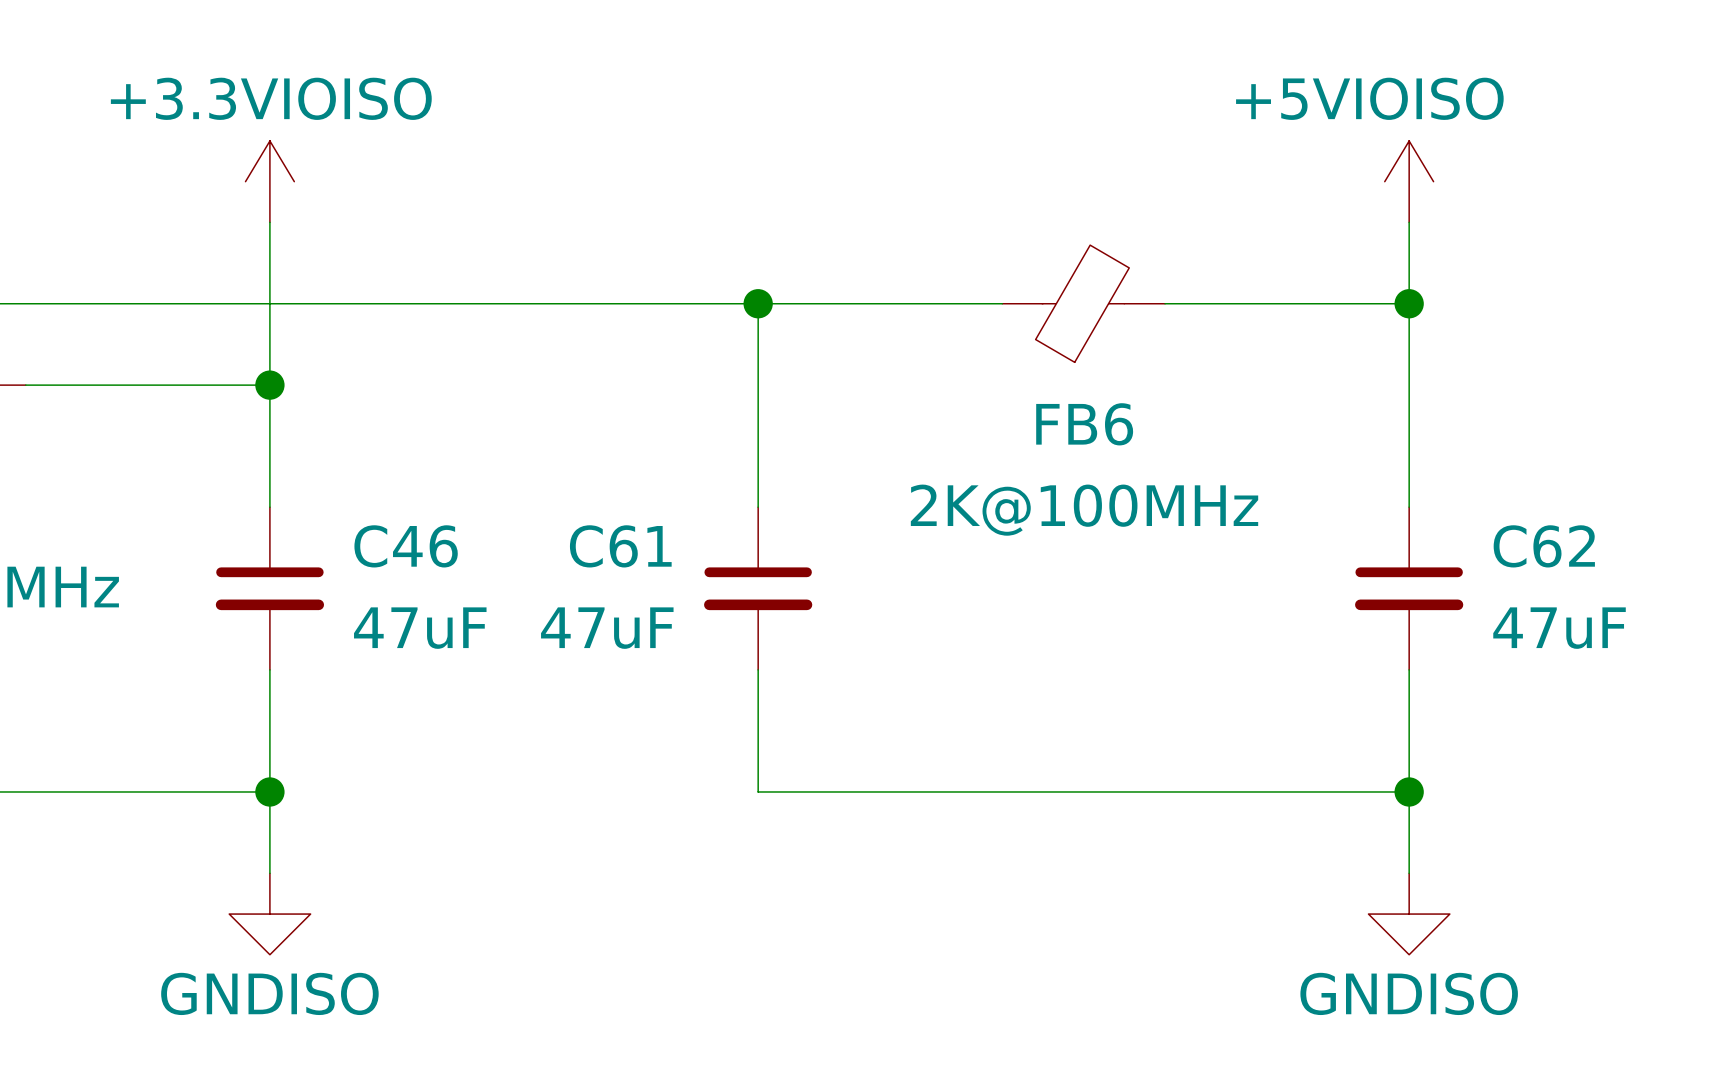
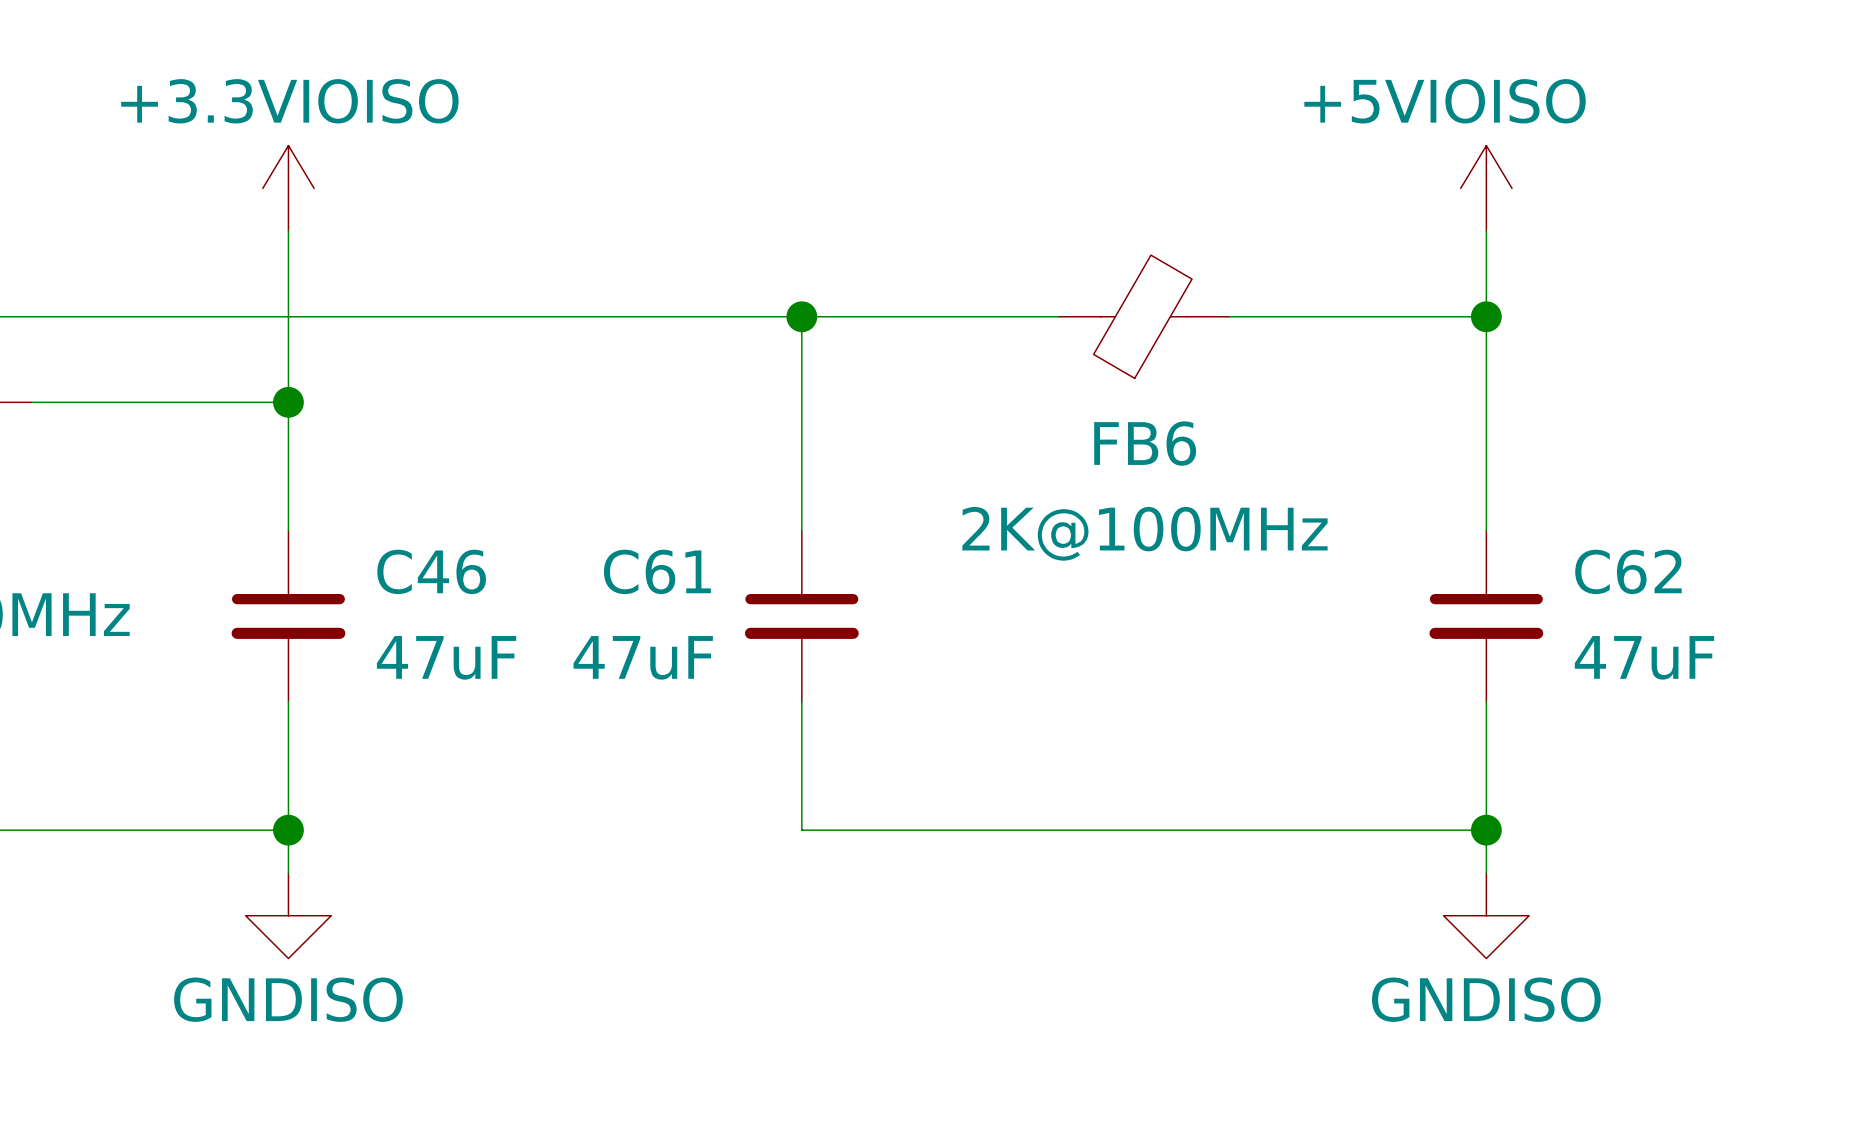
power symbol position: GNDISO (269, 914) -> GNDISO (288, 915)
power symbol position: GNDISO (1409, 914) -> GNDISO (1486, 915)

